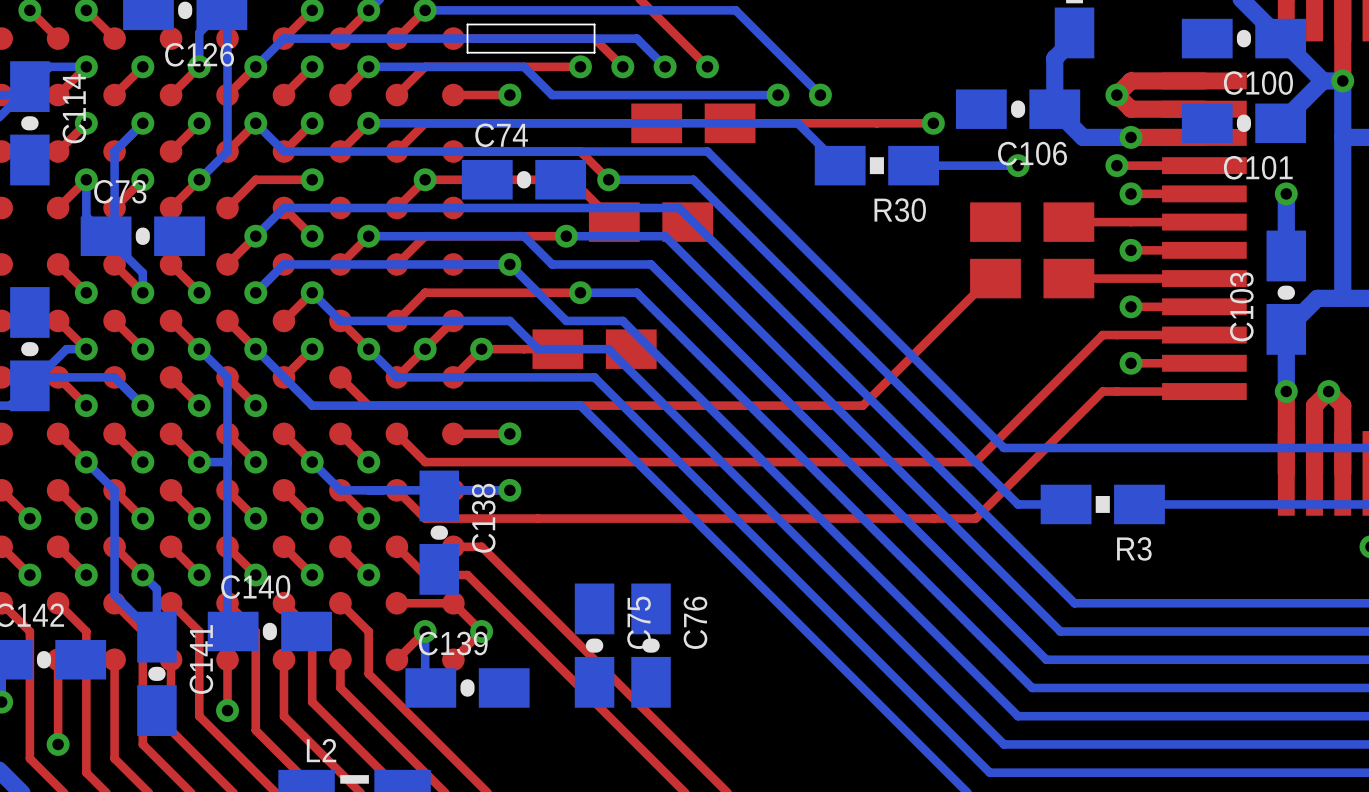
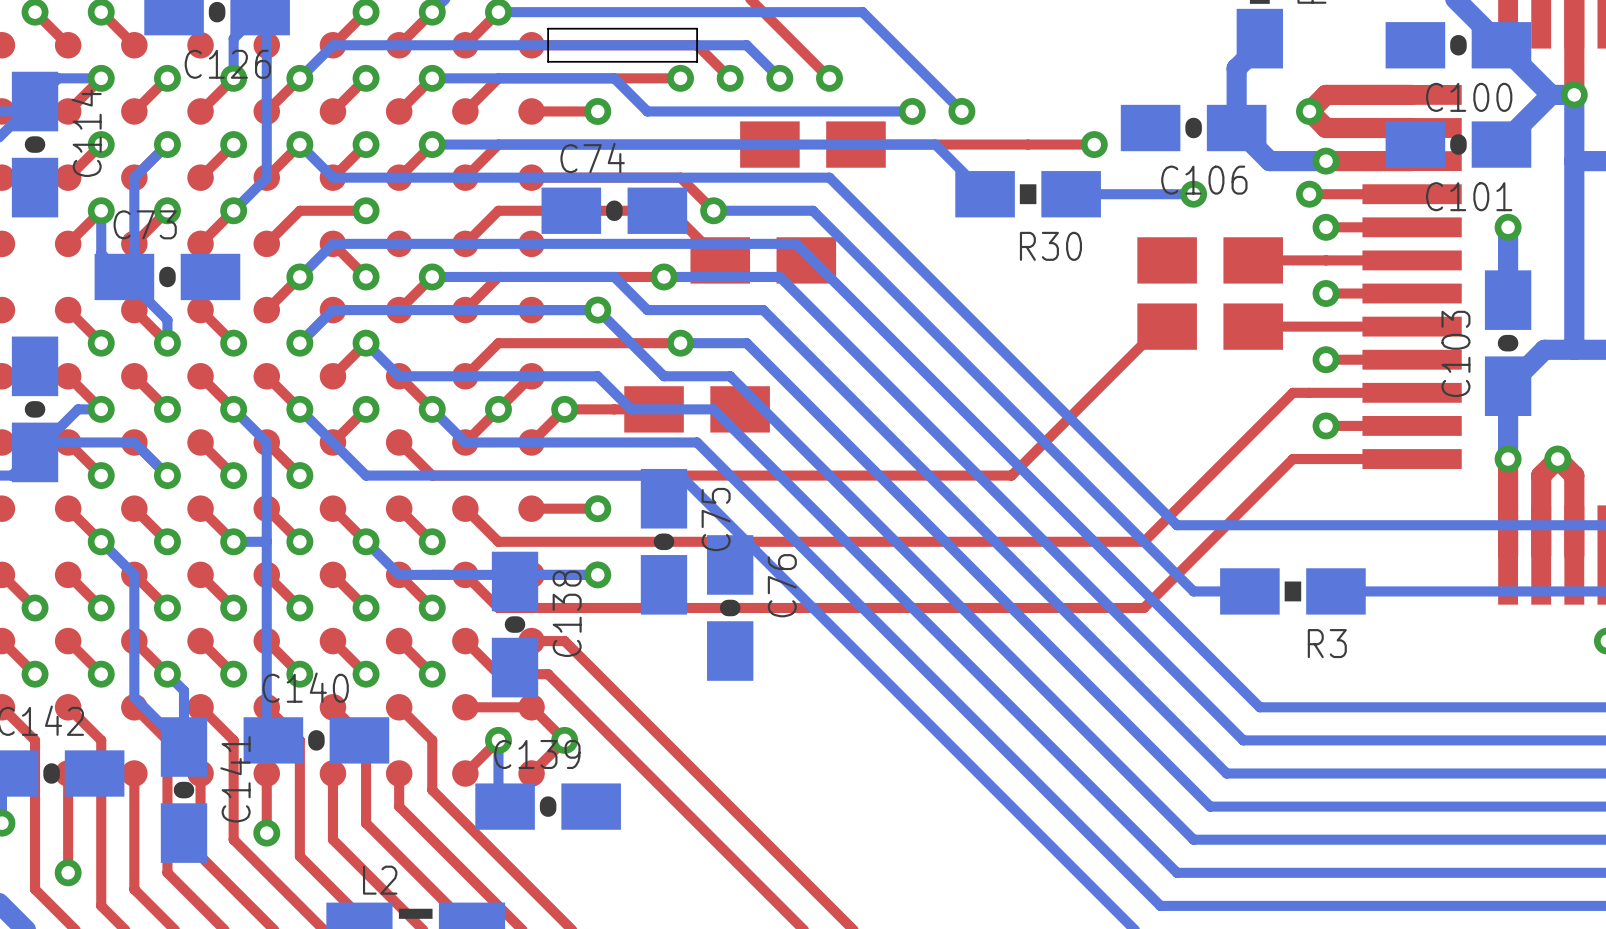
via: (425, 179) -> none
C75 position: (594, 645) -> (663, 541)
C76 position: (651, 645) -> (730, 607)

